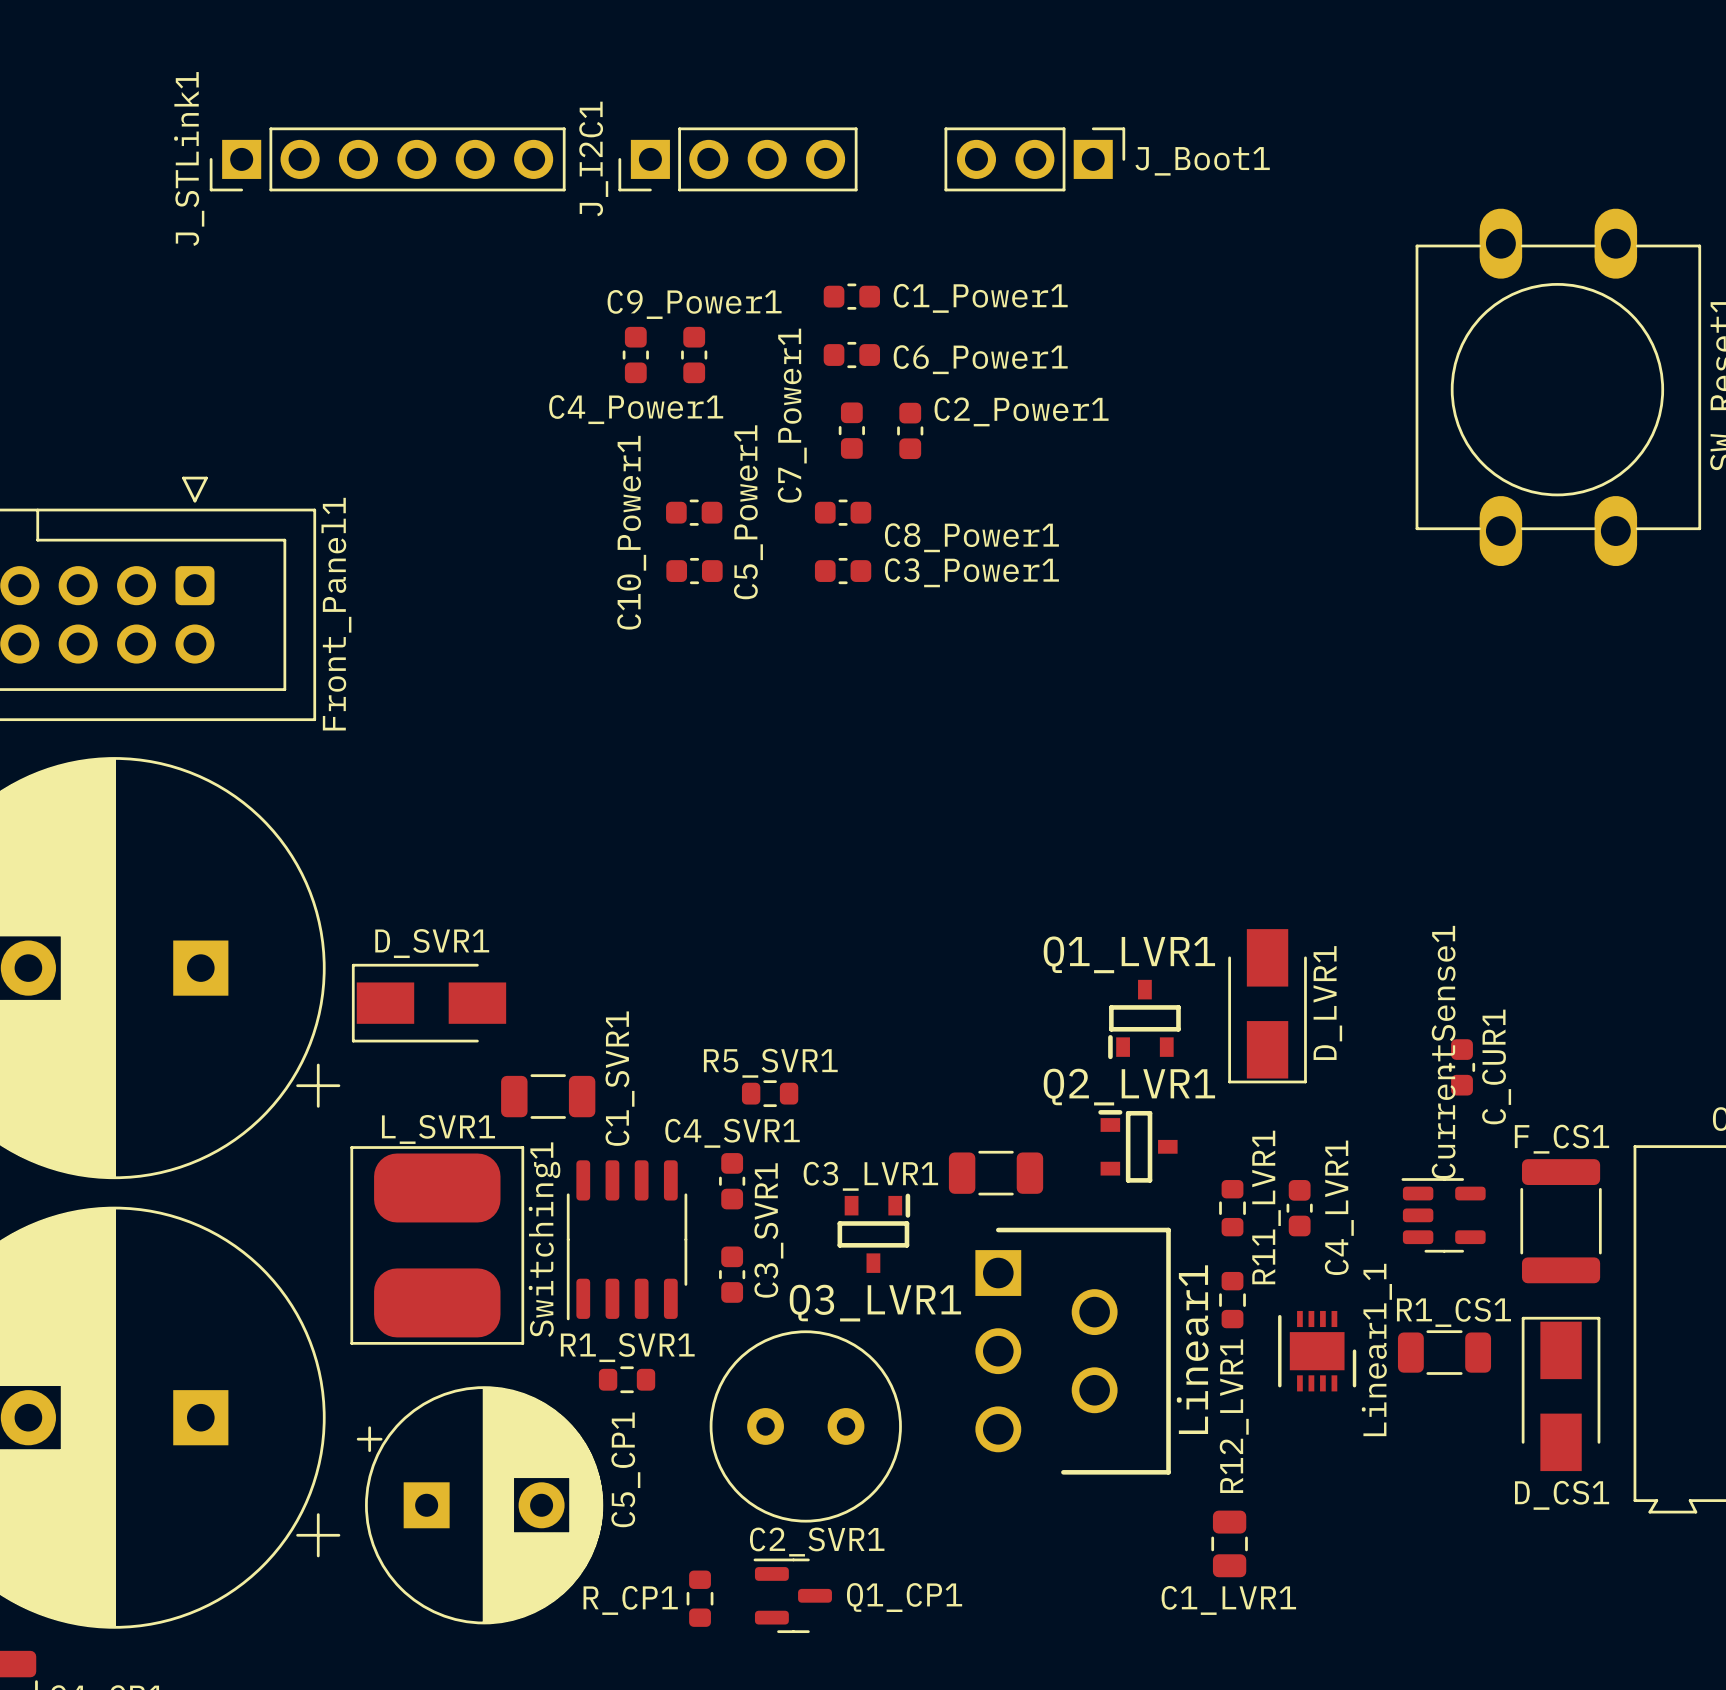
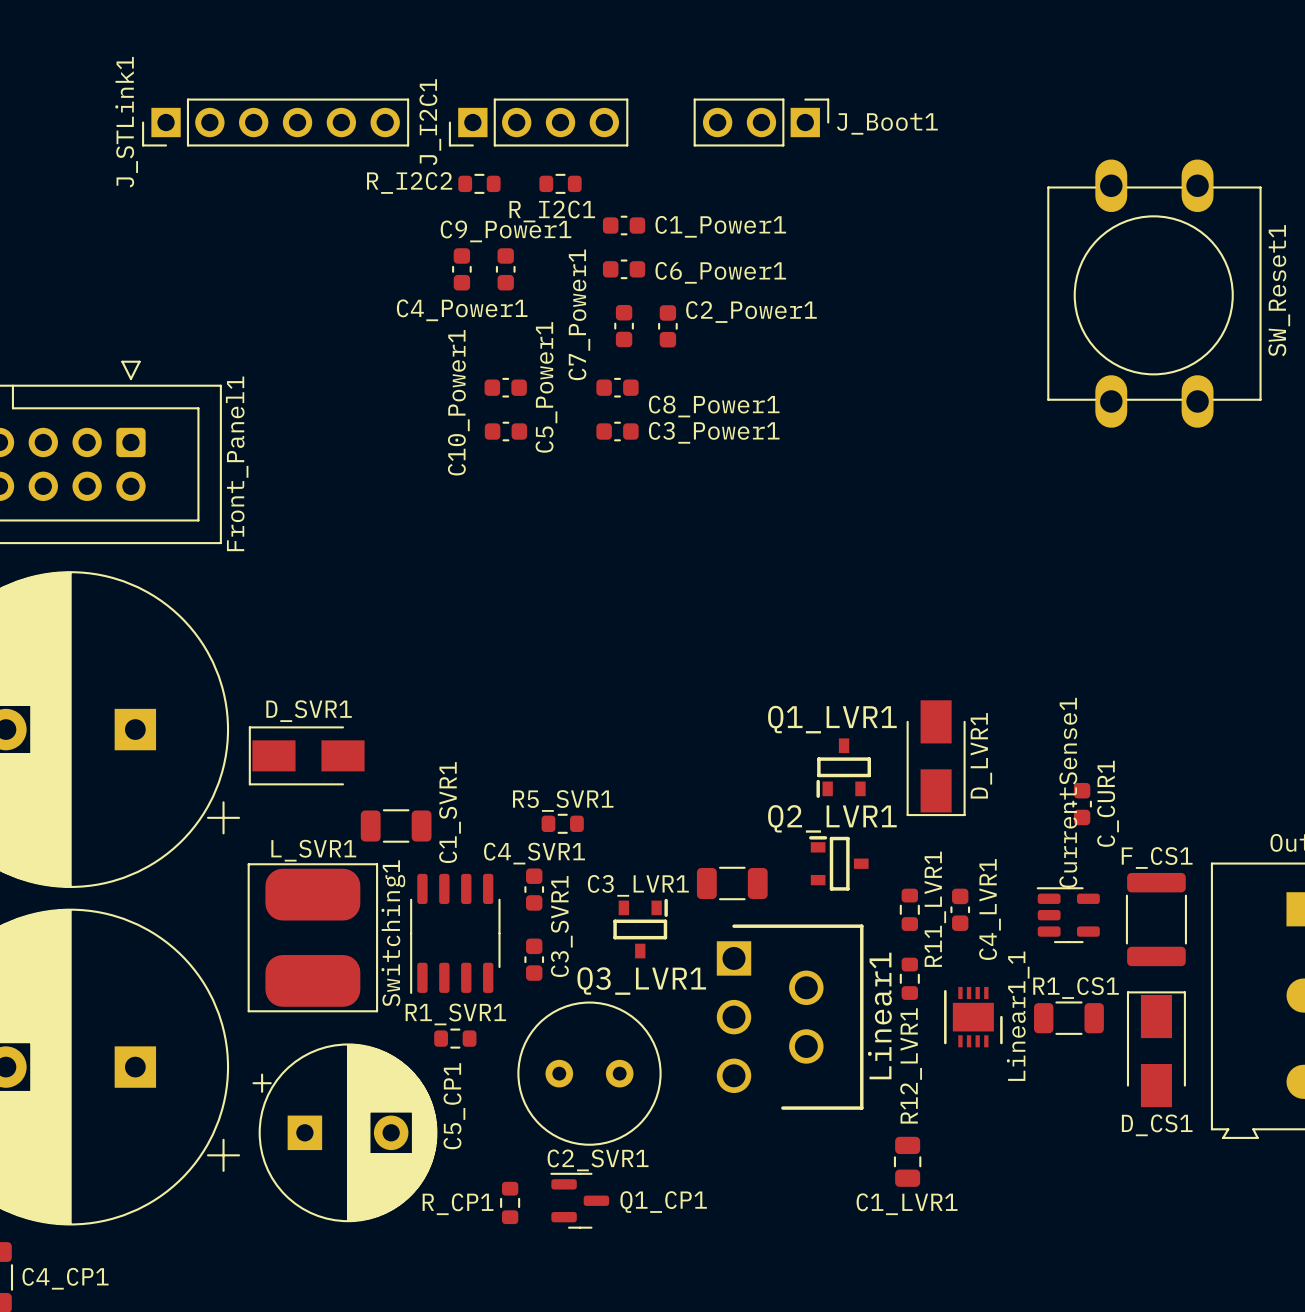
R_I2C2: none -> (479, 183)
R_I2C1: none -> (560, 183)

